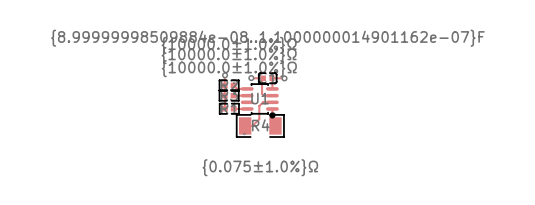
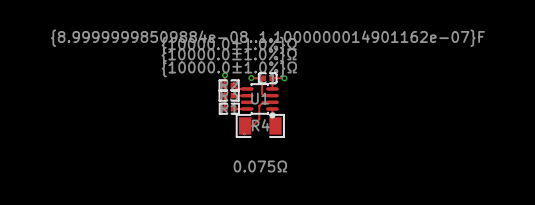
R4 value: {0.075±1.0%}Ω (260, 167) -> 0.075Ω (260, 166)

